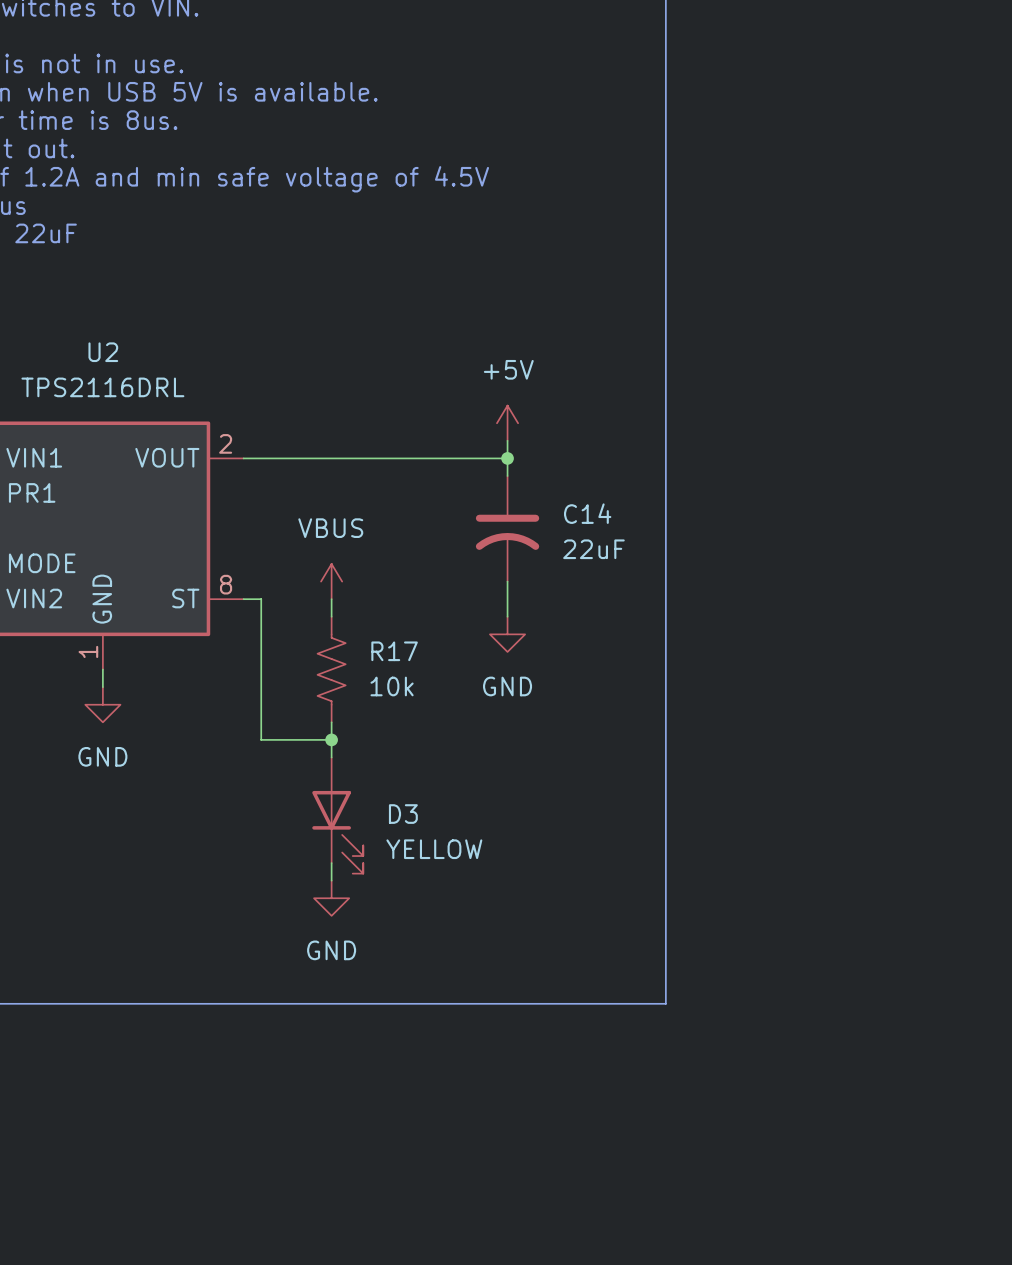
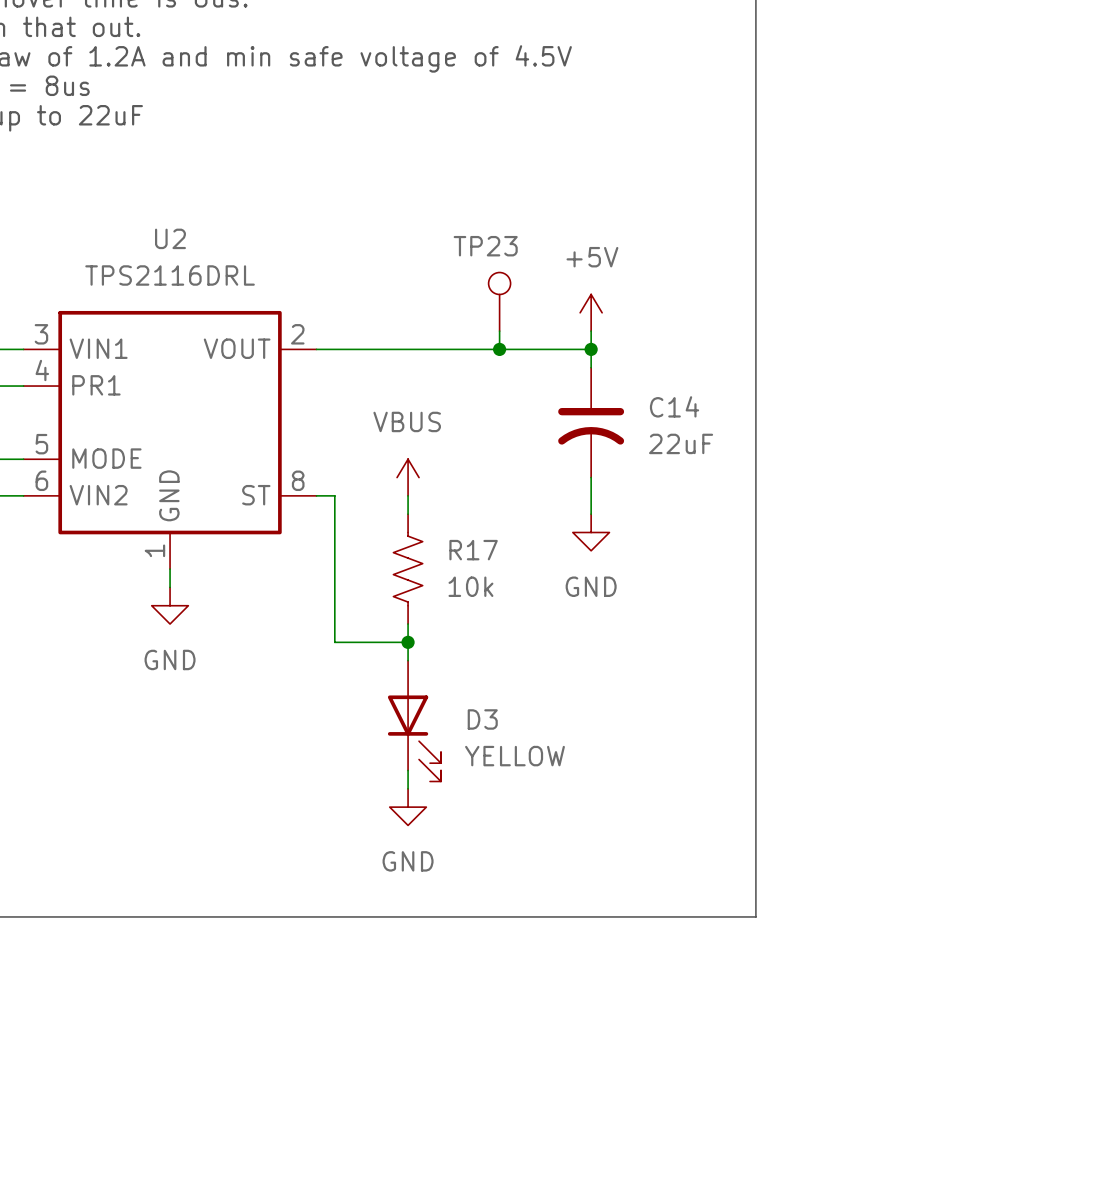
TP23: none -> (499, 301)
wire: none -> (499, 331) (499, 349)
junction: none -> (499, 349)

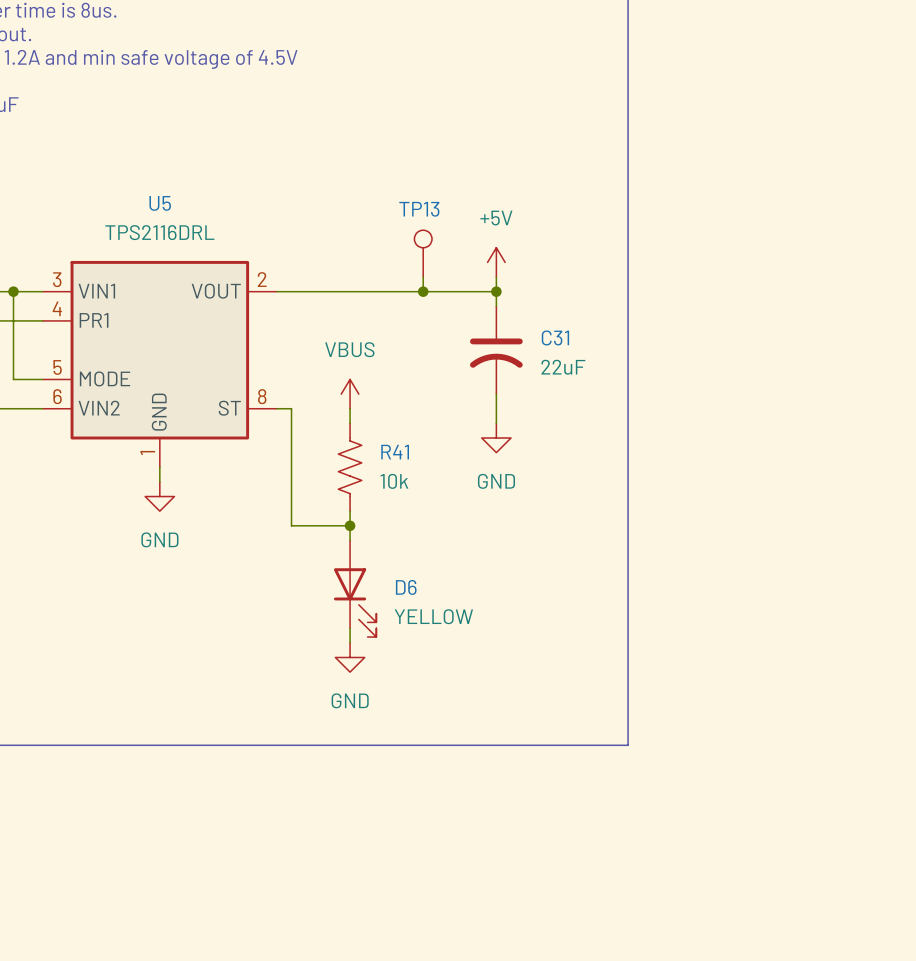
U2 name: U2 (170, 238) -> U5 (160, 203)
TP23 name: TP23 (485, 246) -> TP13 (419, 209)
C14 name: C14 (674, 406) -> C31 (555, 337)
R17 name: R17 (473, 550) -> R41 (395, 452)
D3 name: D3 (482, 719) -> D6 (406, 587)

